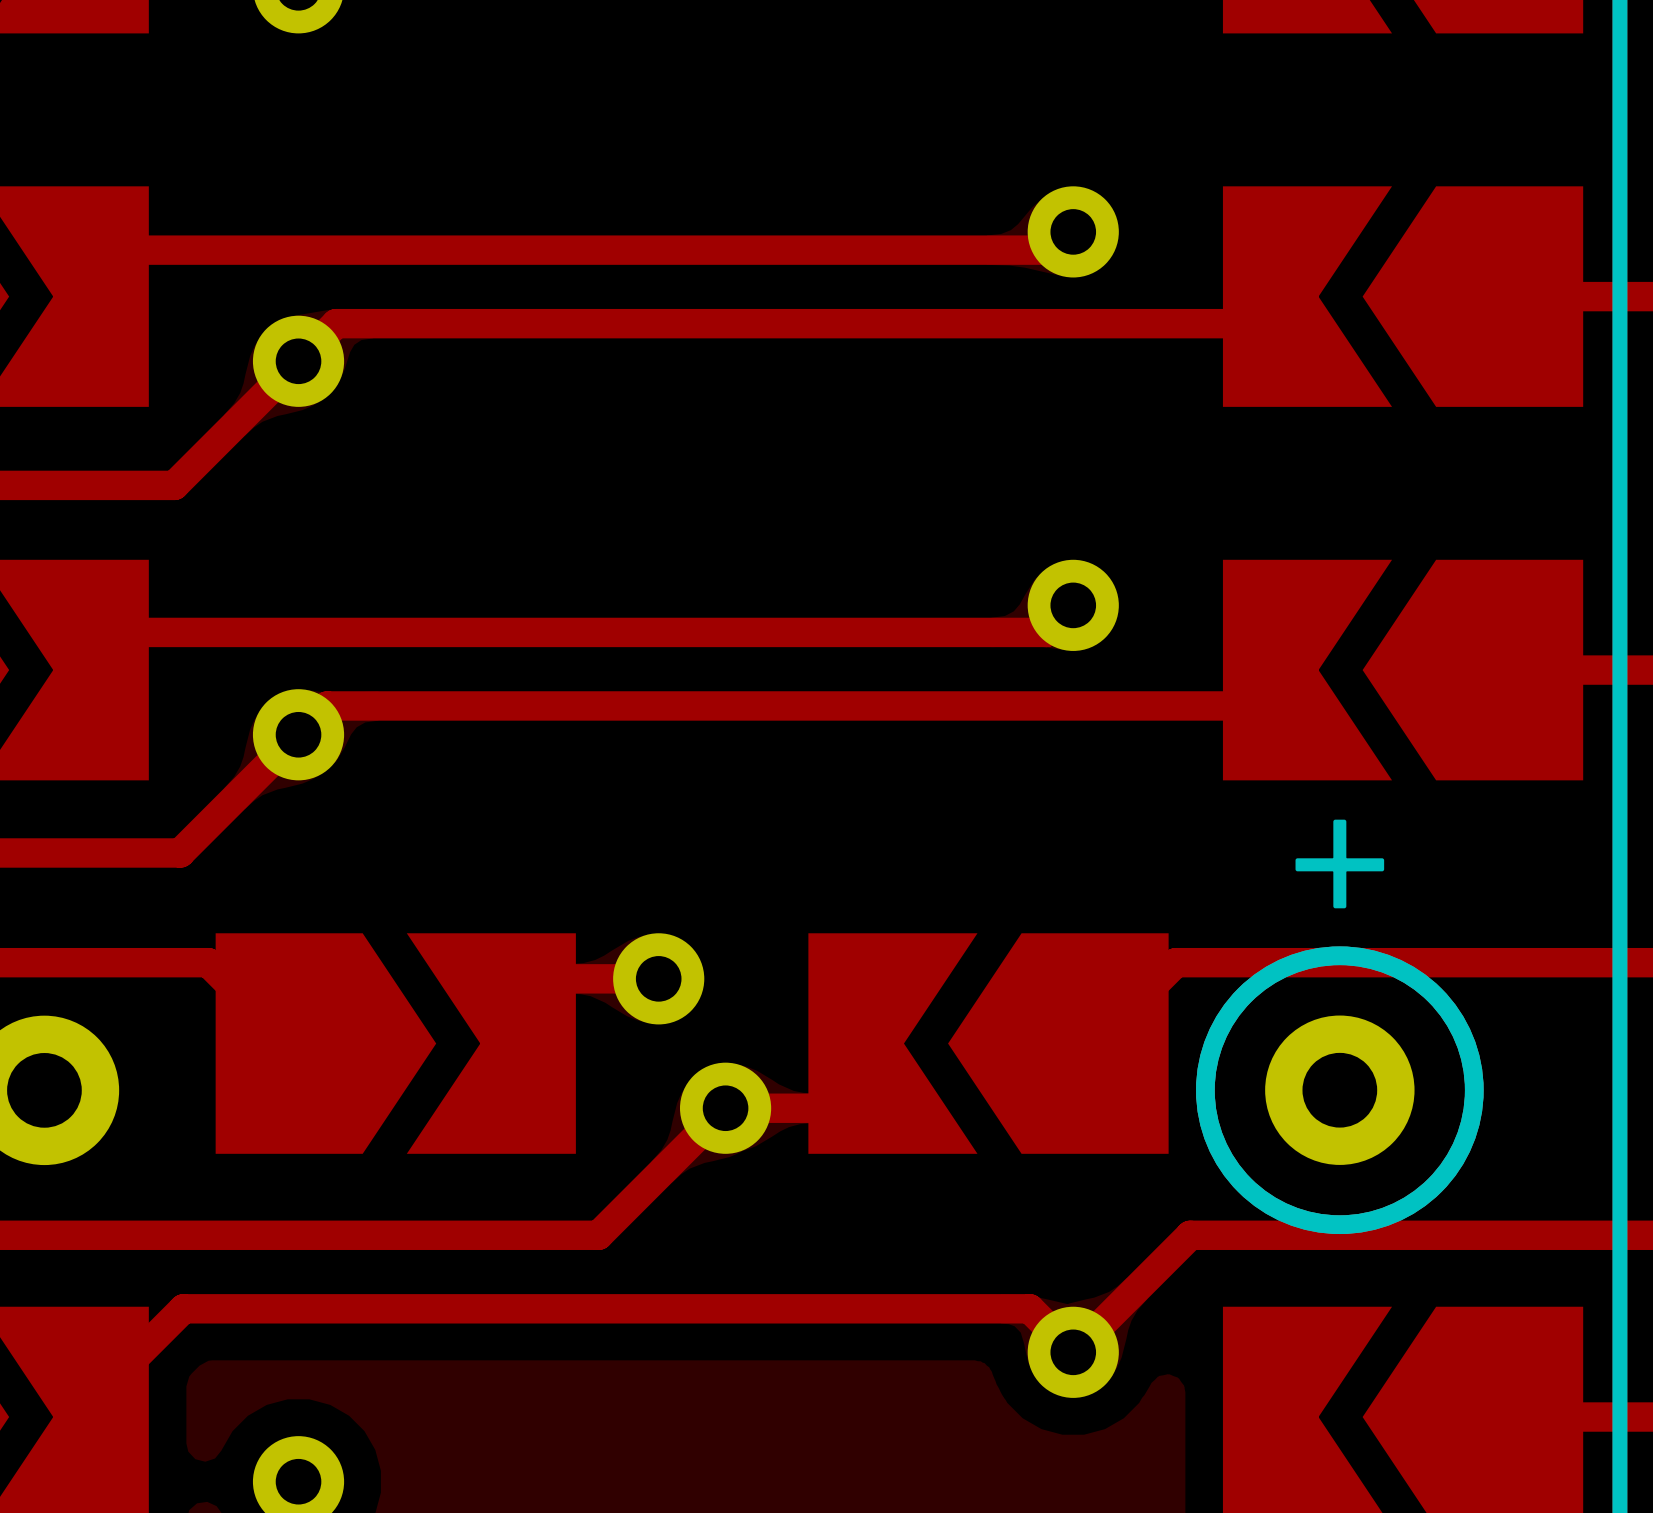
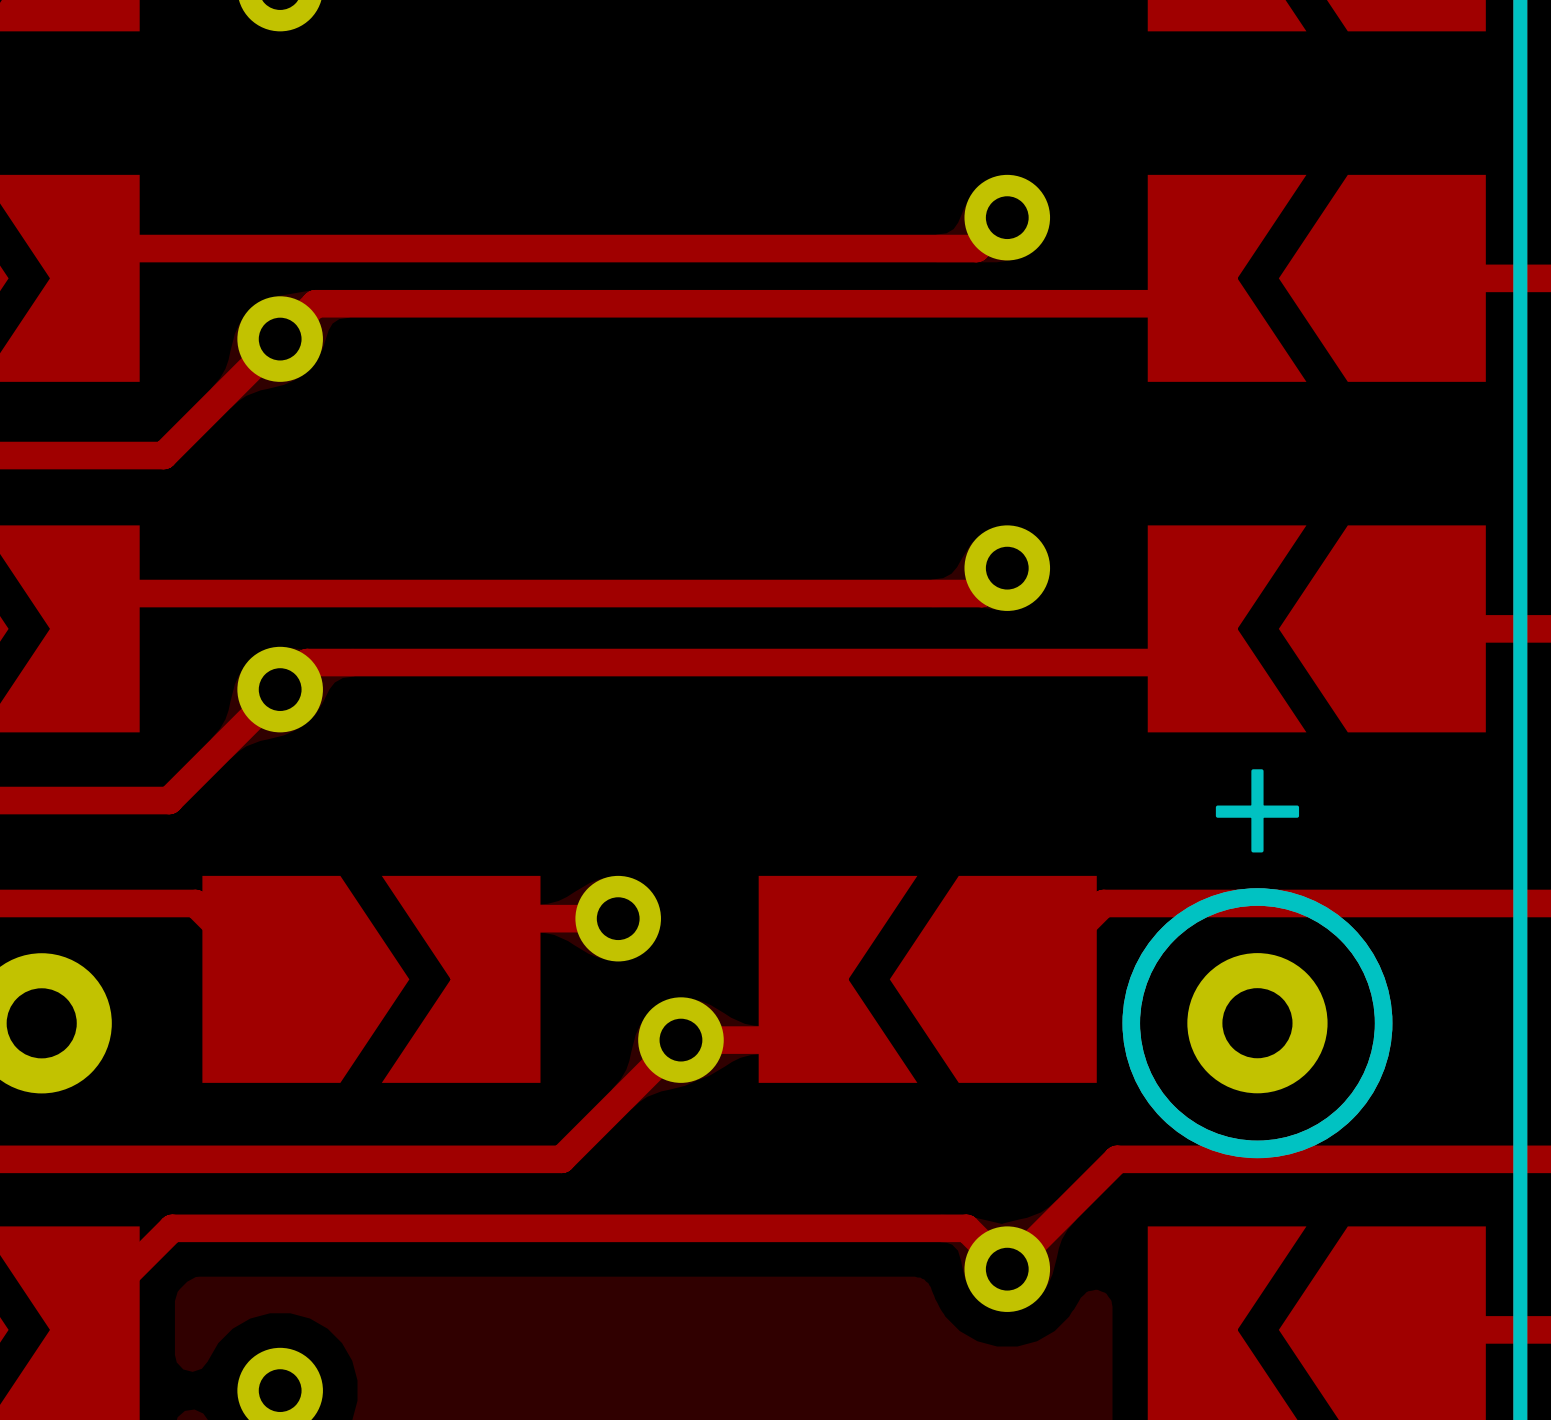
track: (1055, 250) (121, 250) (107, 264) -> (990, 234) (976, 248) (100, 248)

